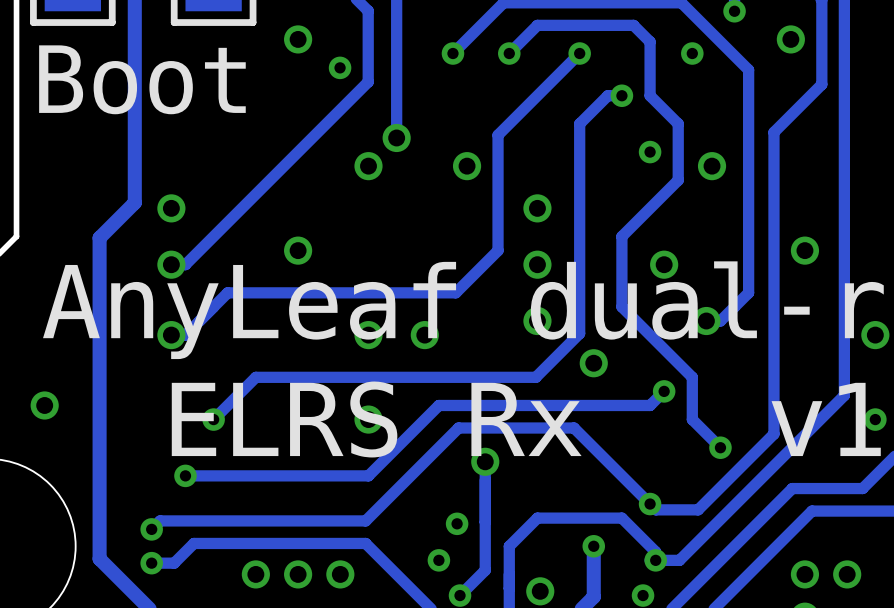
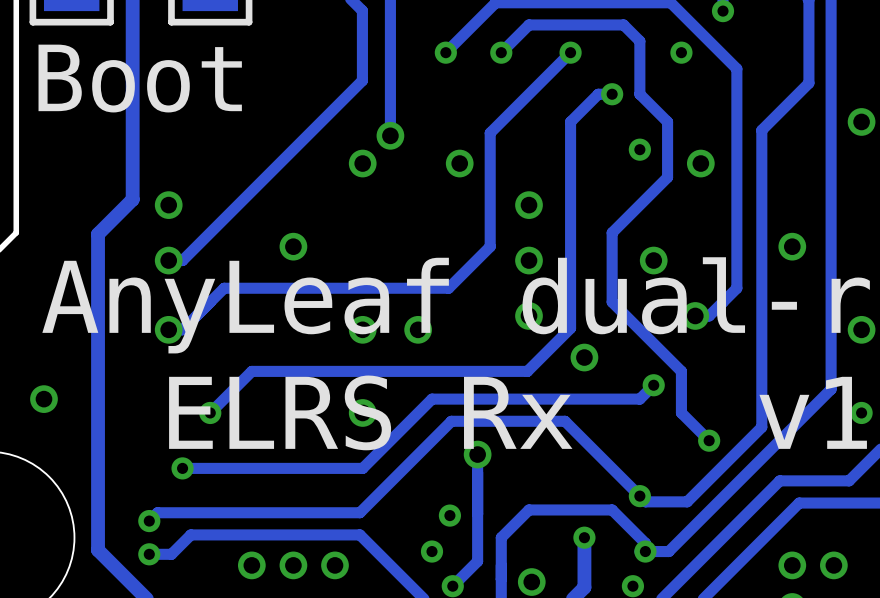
via: (298, 39) -> none
via position: (790, 39) -> (861, 121)
via: (340, 67) -> none

